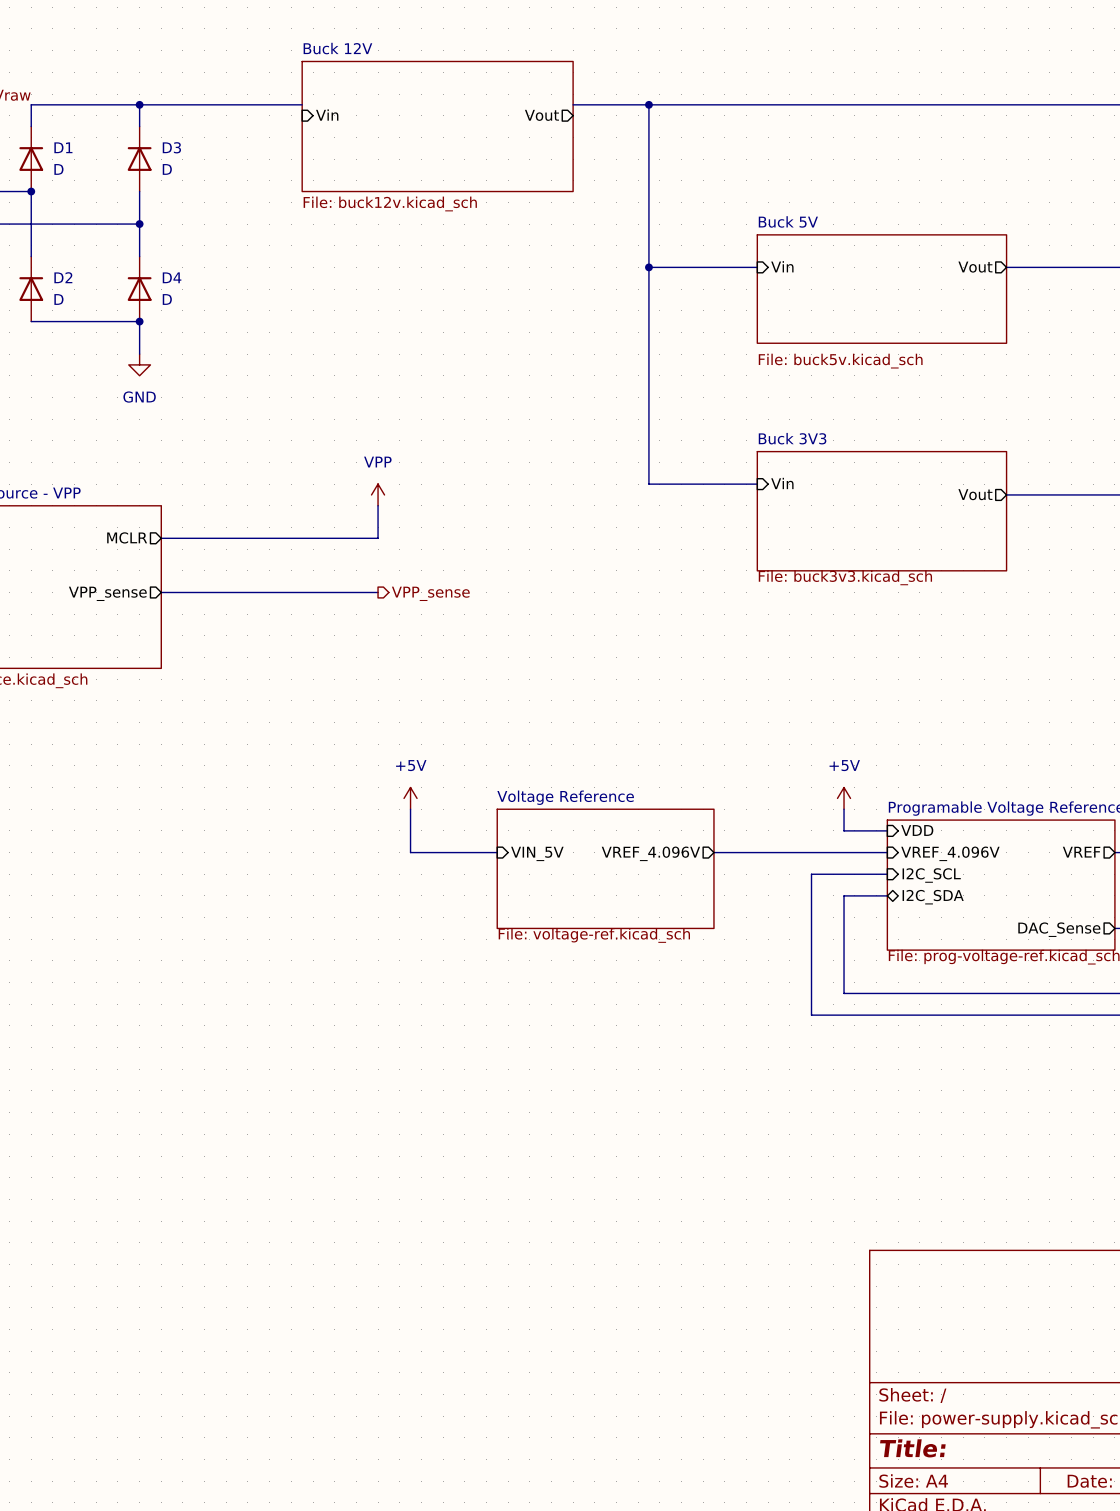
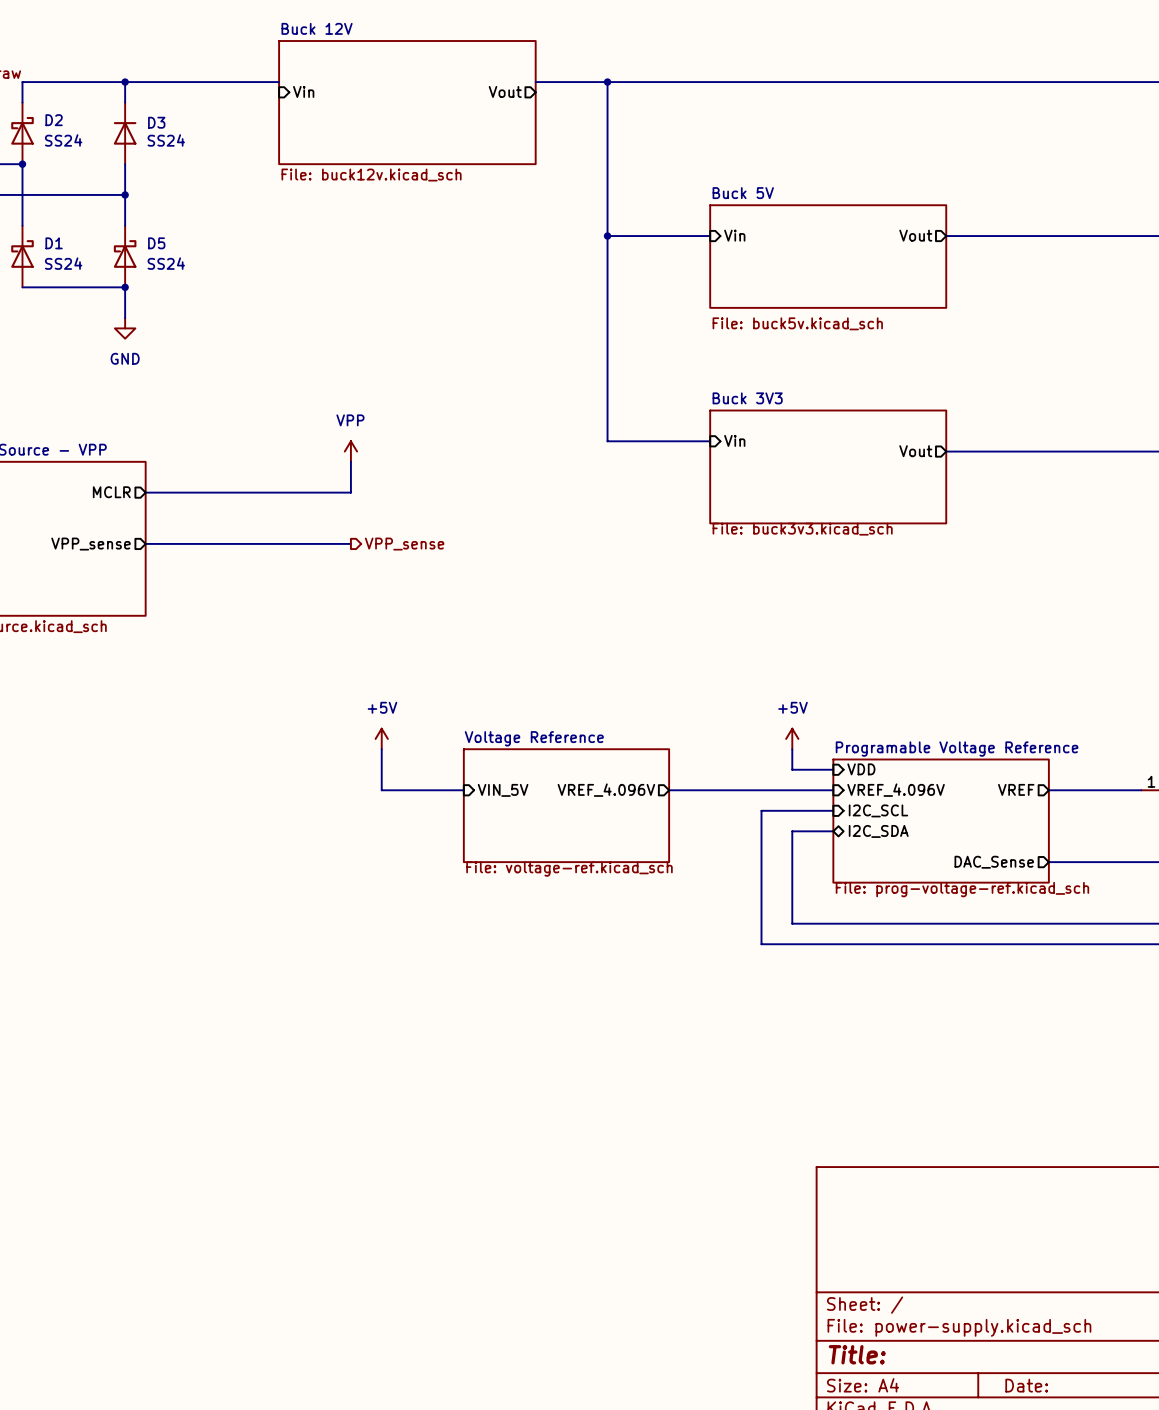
D1 symbol: [19, 126, 44, 192] -> [11, 225, 34, 288]
D1 value: D (58, 169) -> SS24 (63, 263)
D3 value: D (167, 169) -> SS24 (166, 140)
D2 symbol: [19, 256, 44, 322] -> [11, 102, 34, 165]
D4: D (139, 289) -> none
D5: none -> SS24 (125, 256)
D2 value: D (58, 299) -> SS24 (63, 140)

